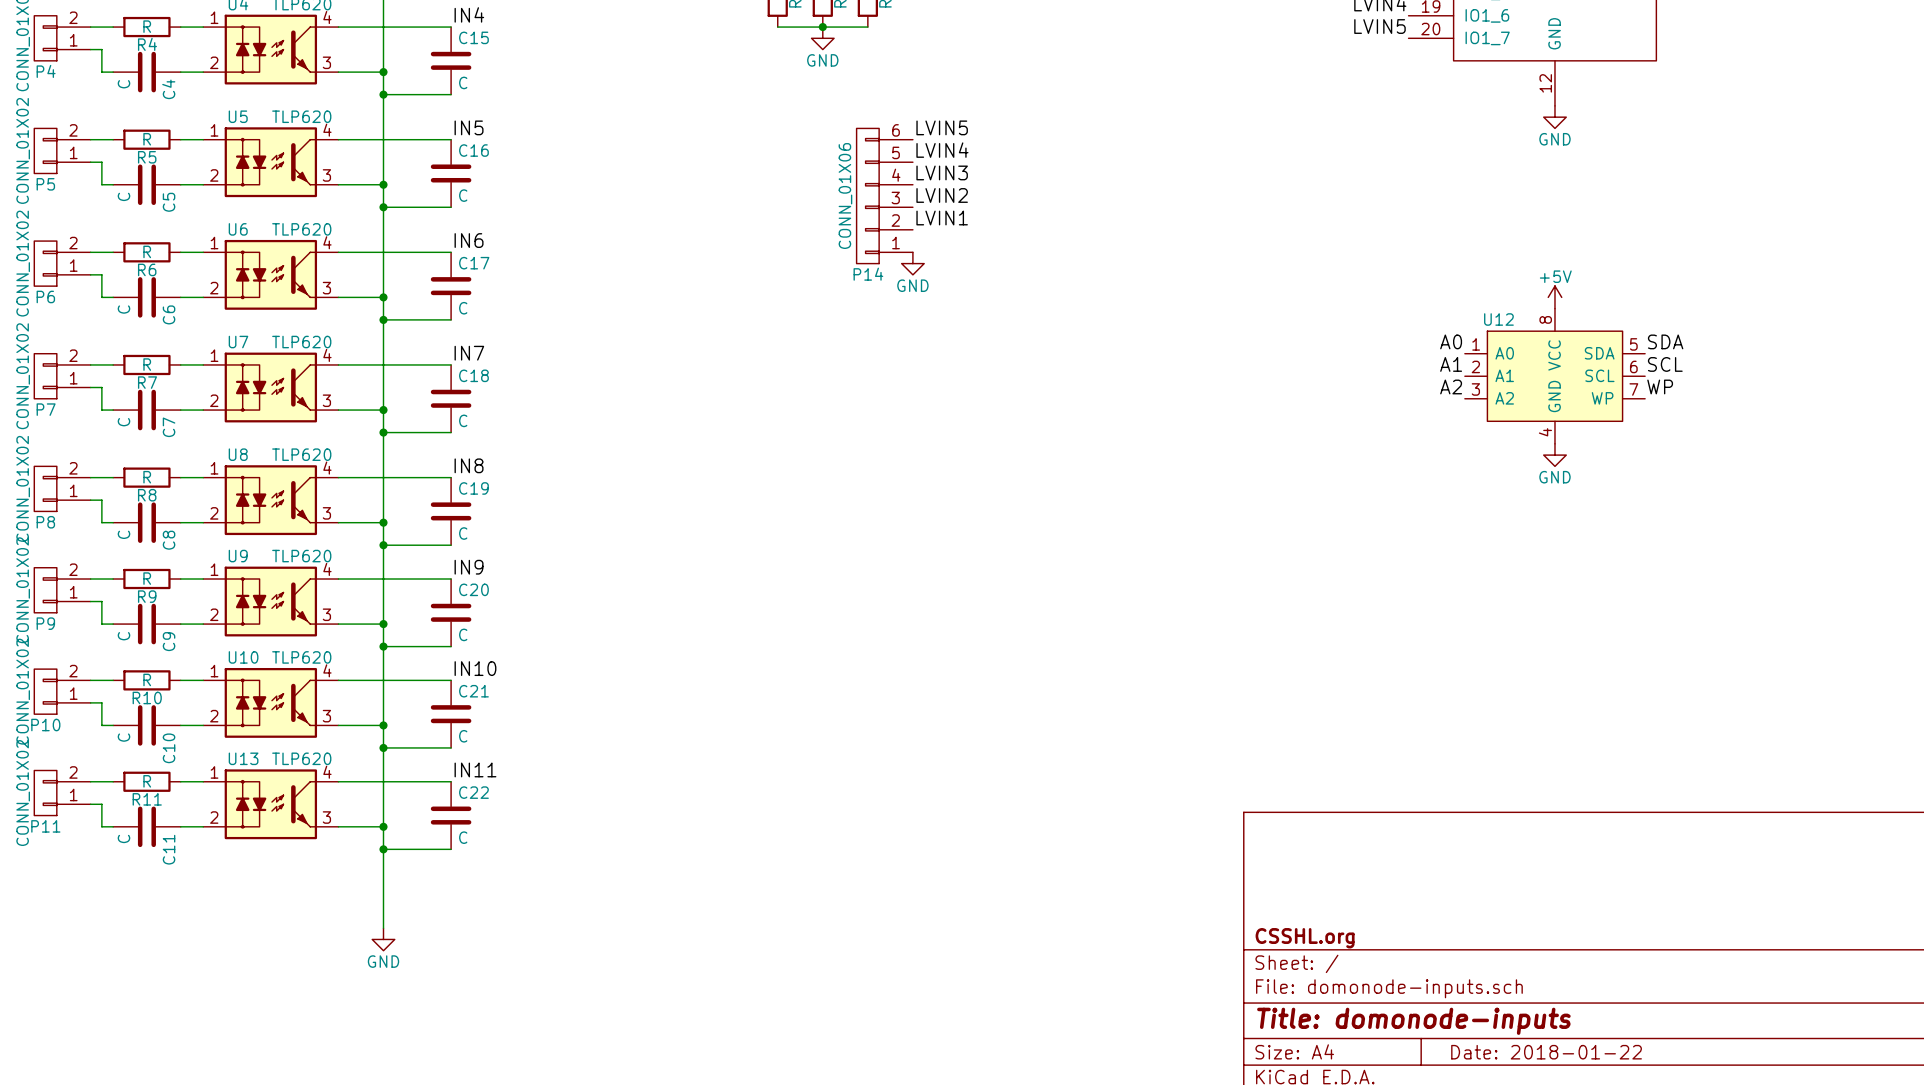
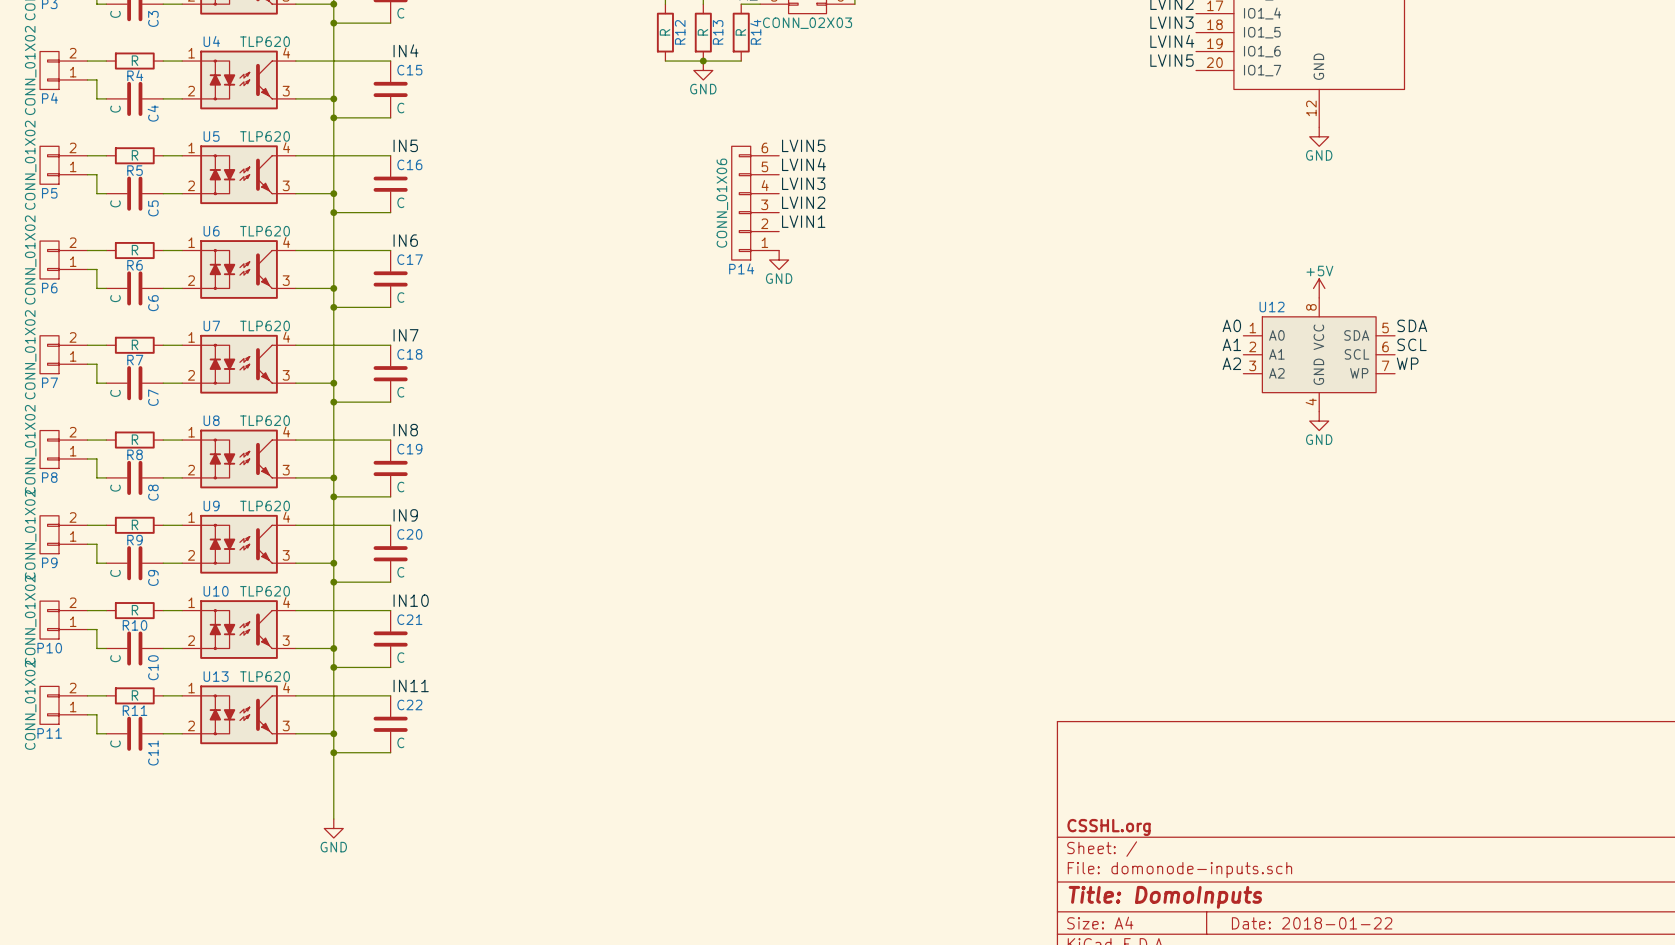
title block: Title: domonode-inputs (1413, 1021) -> Title: DomoInputs (1165, 897)

